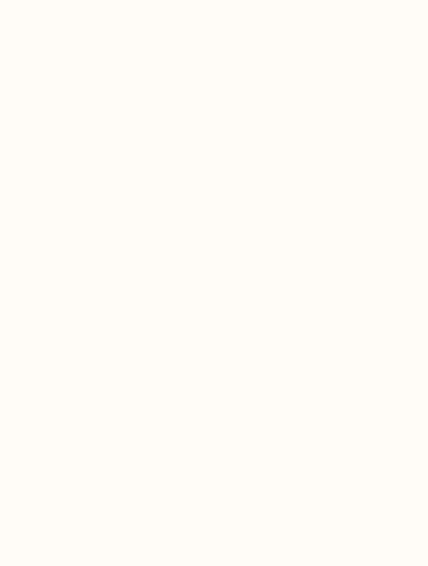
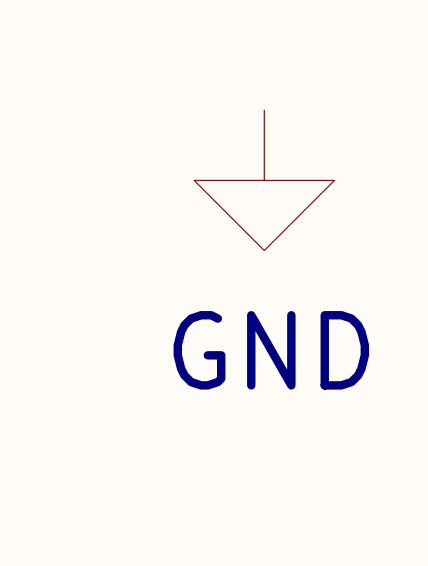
power symbol: none -> GND (264, 180)

